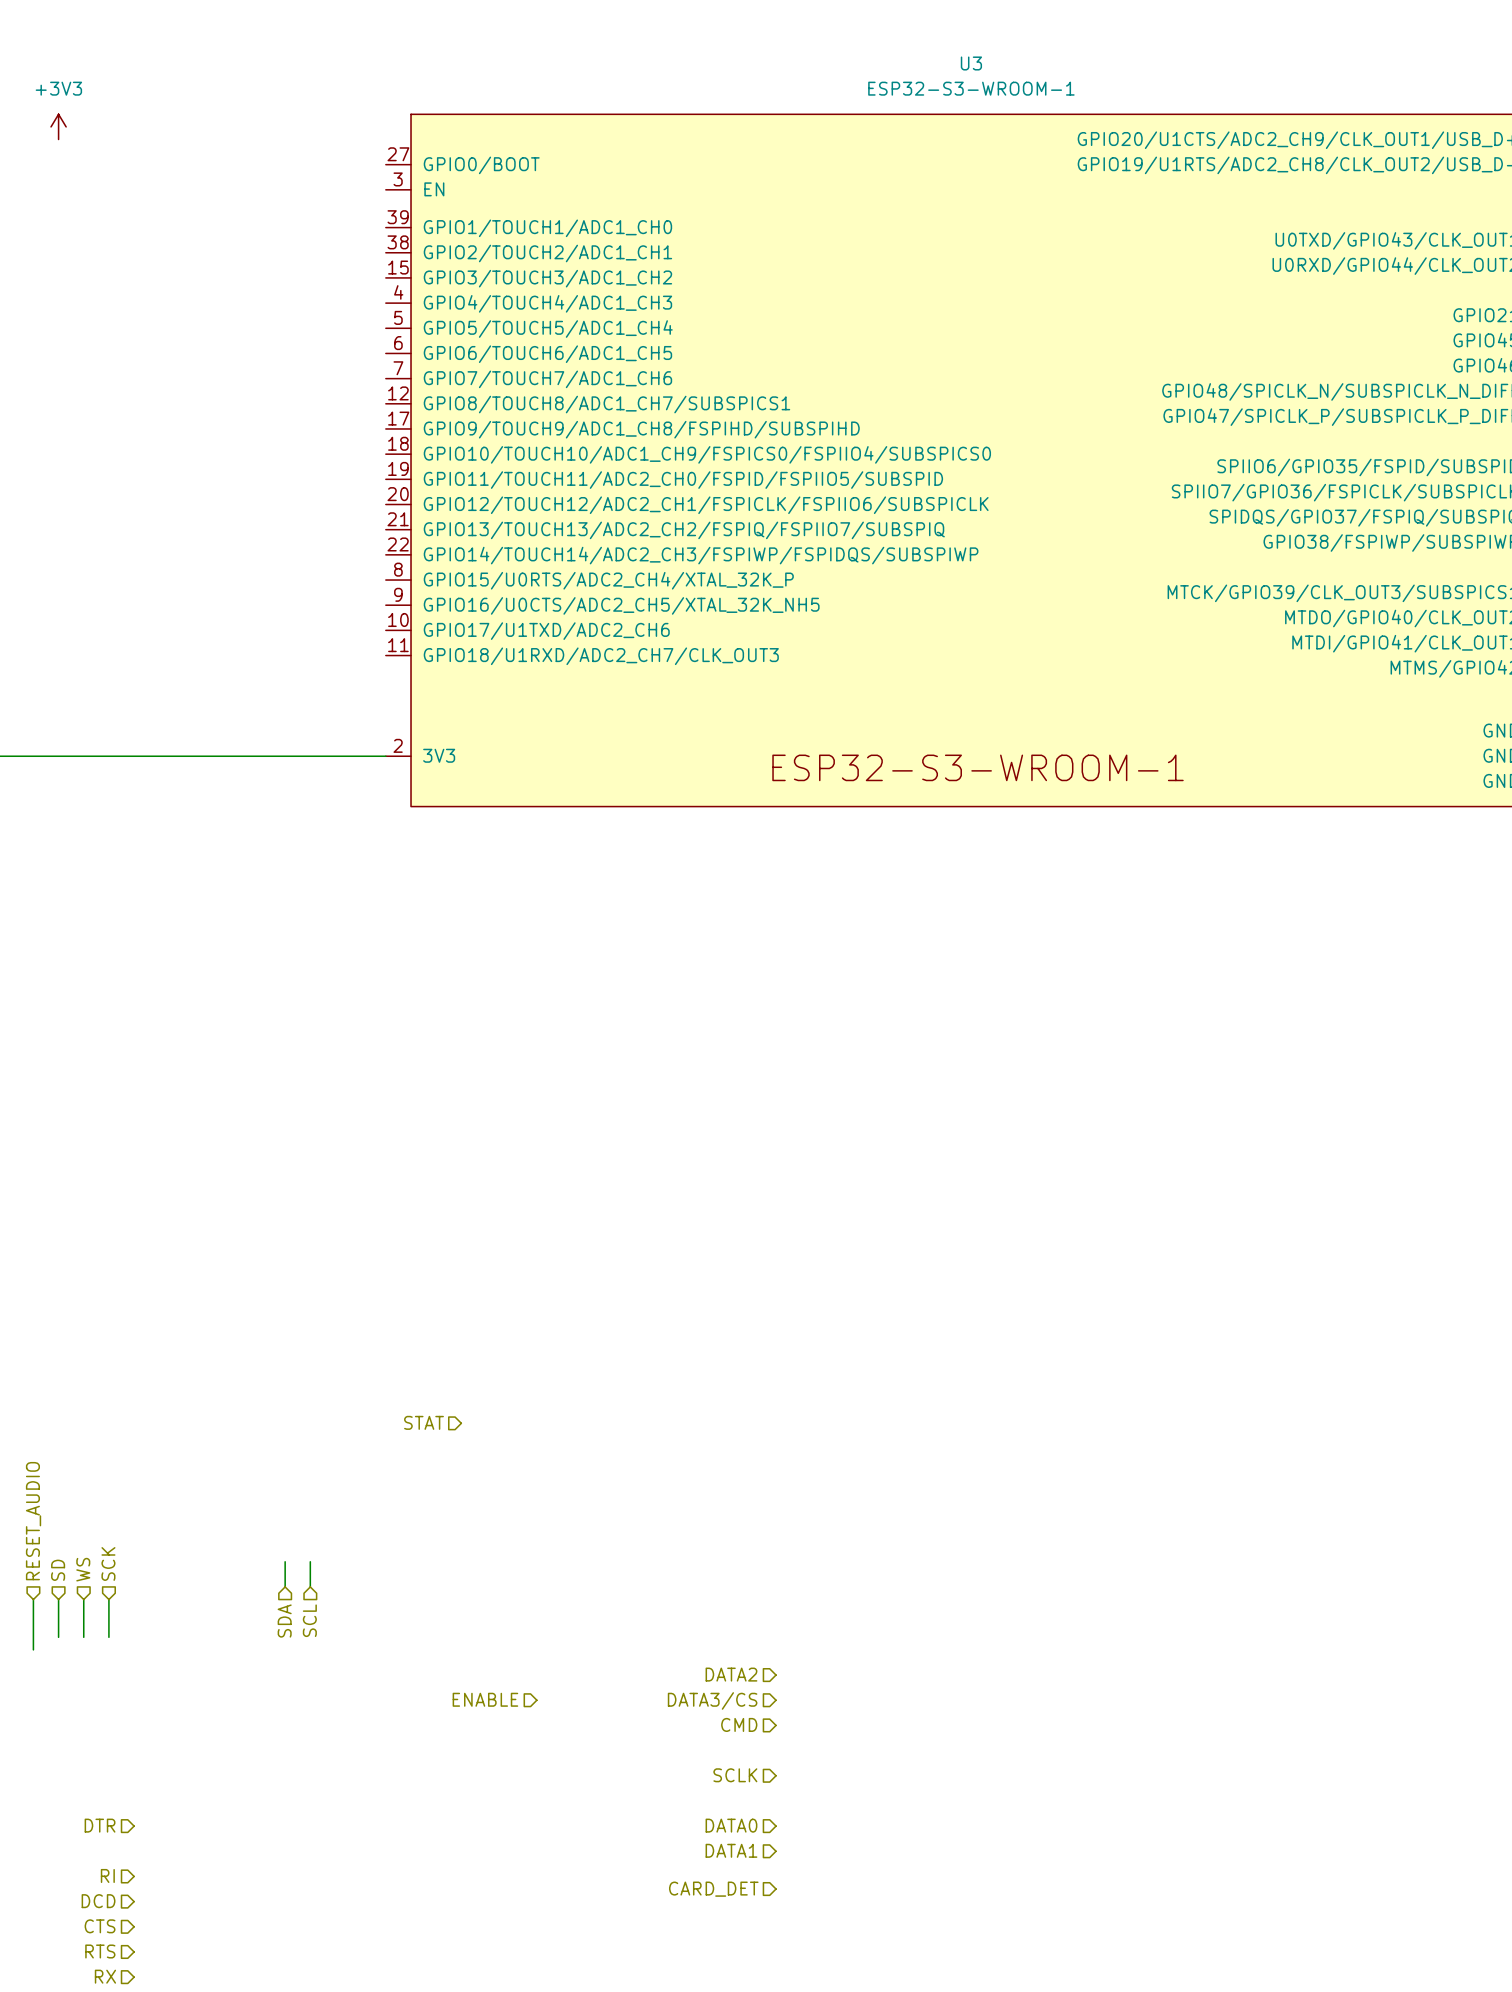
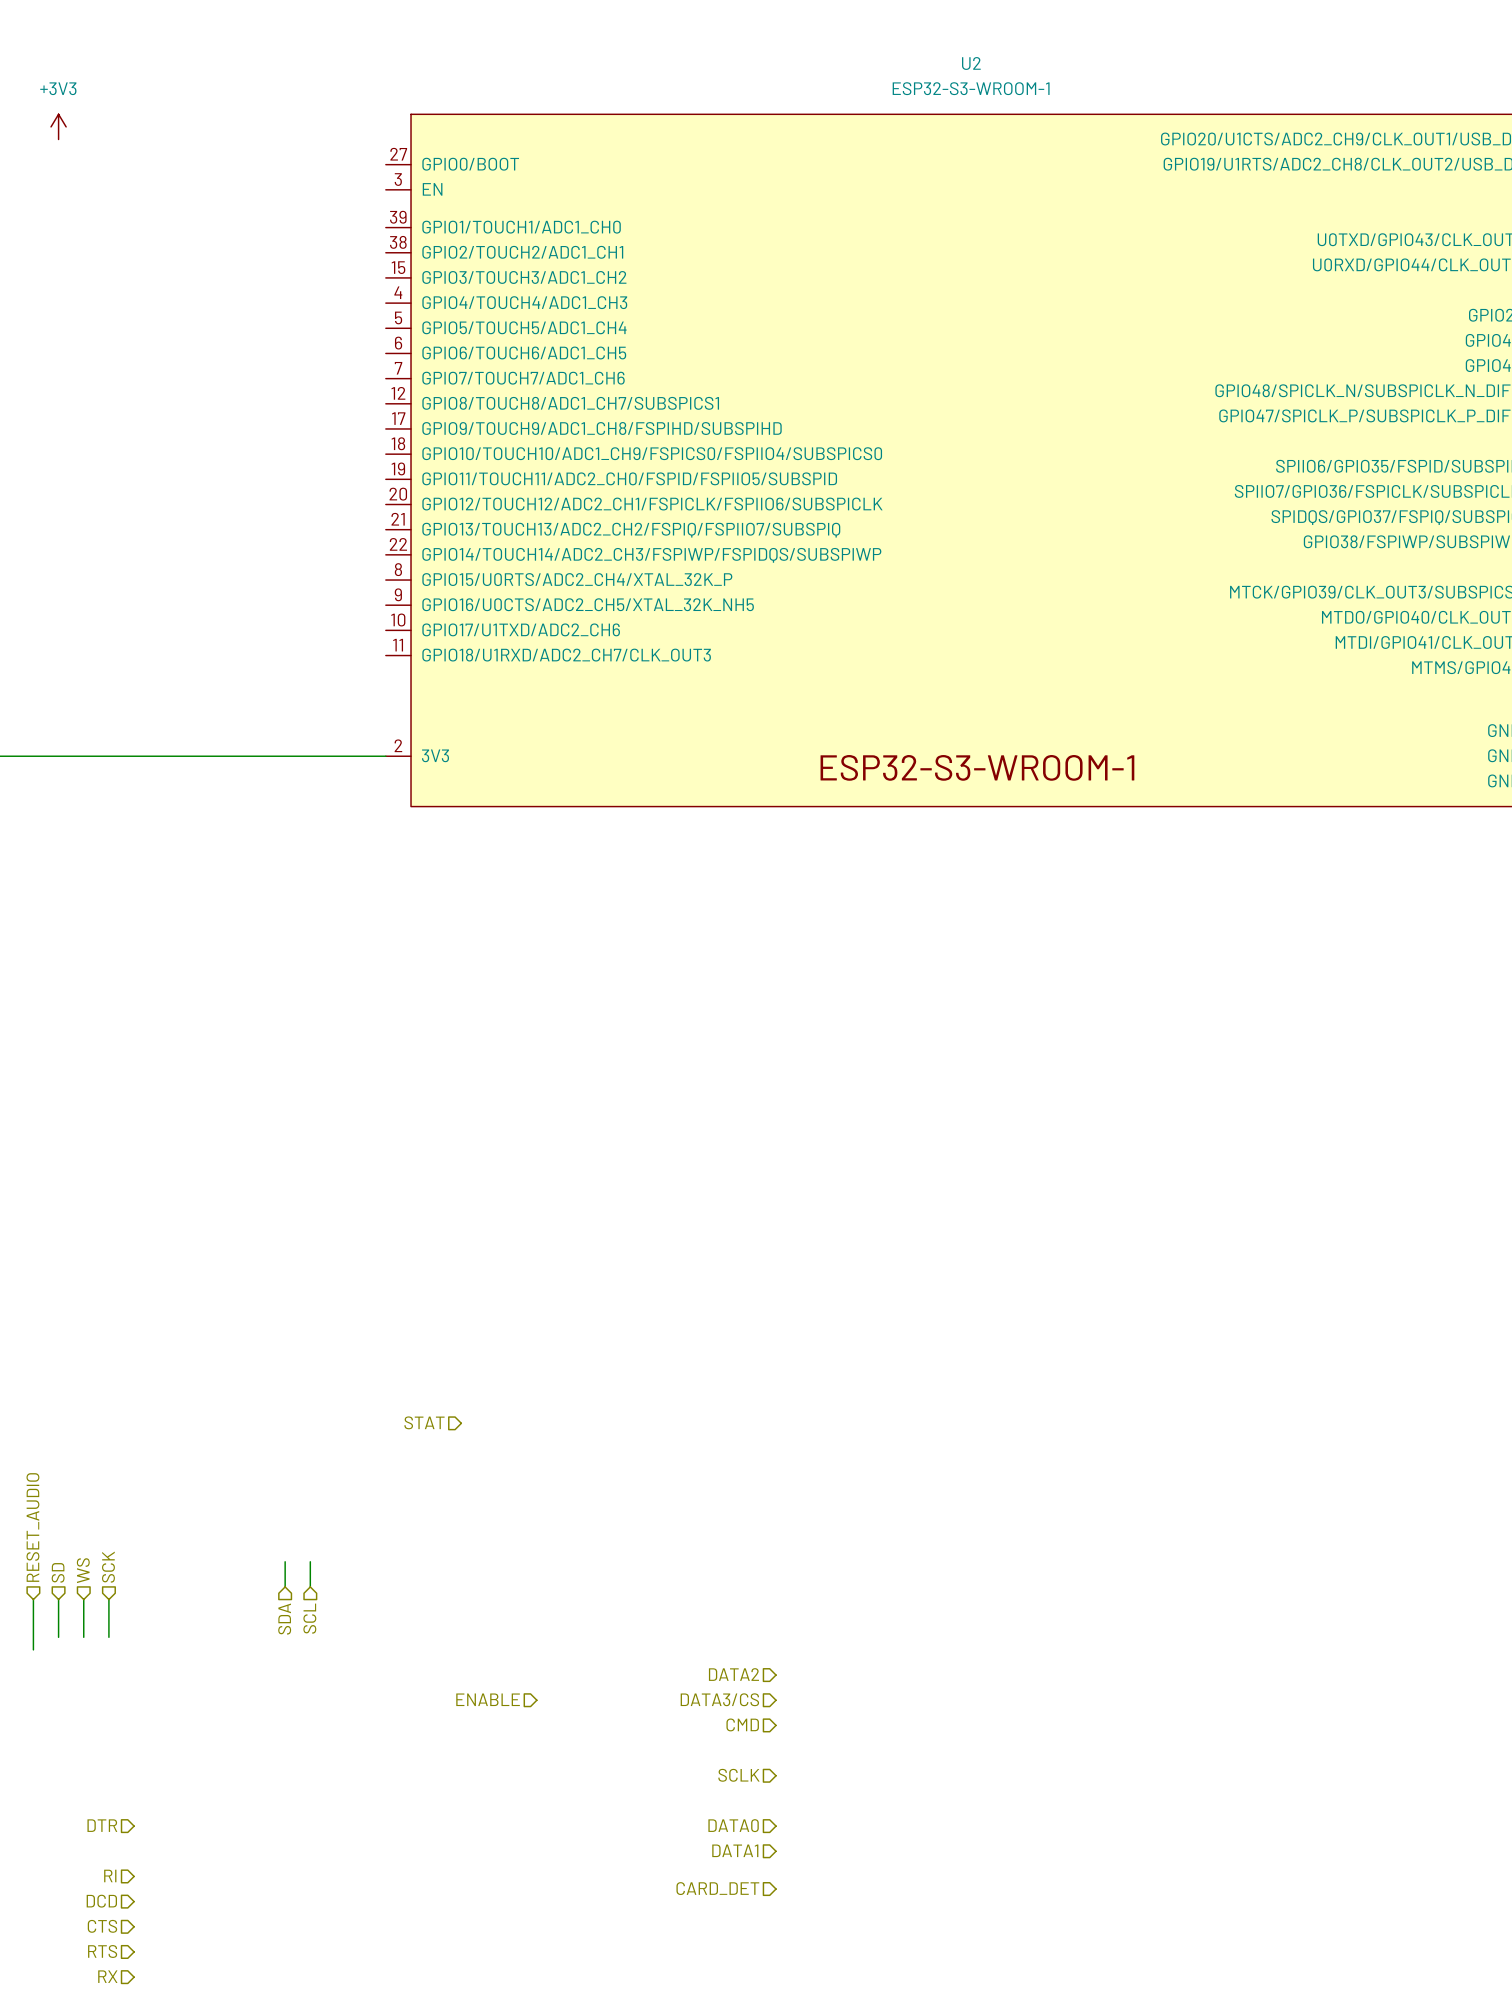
U3 name: U3 (971, 63) -> U2 (971, 63)

